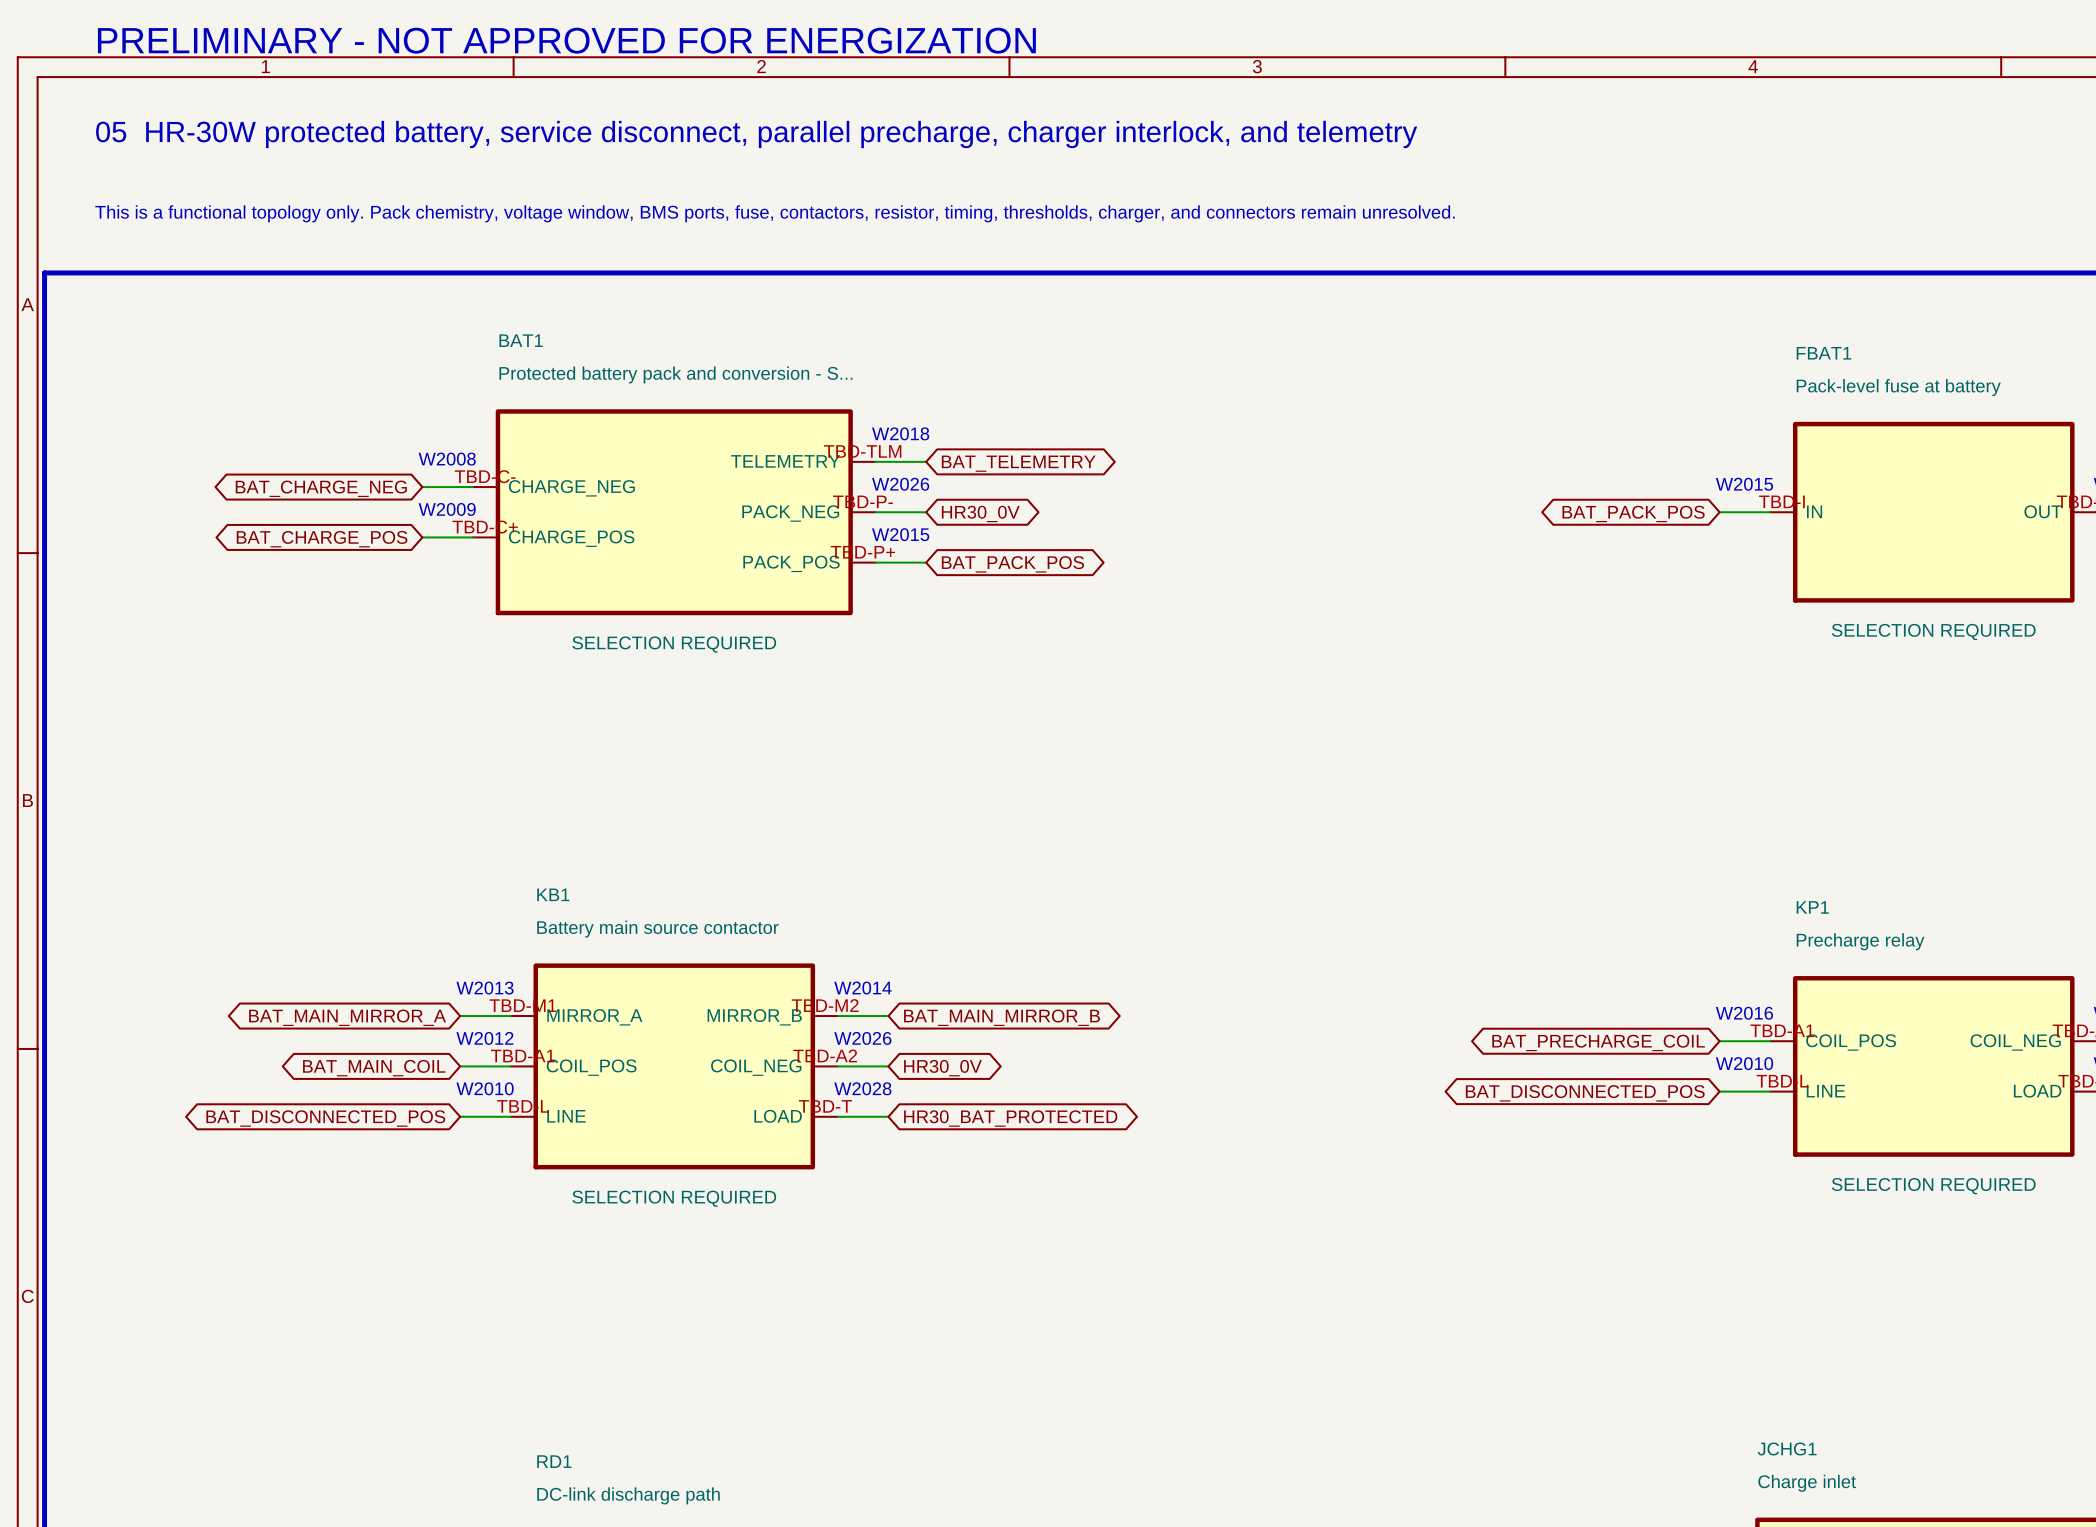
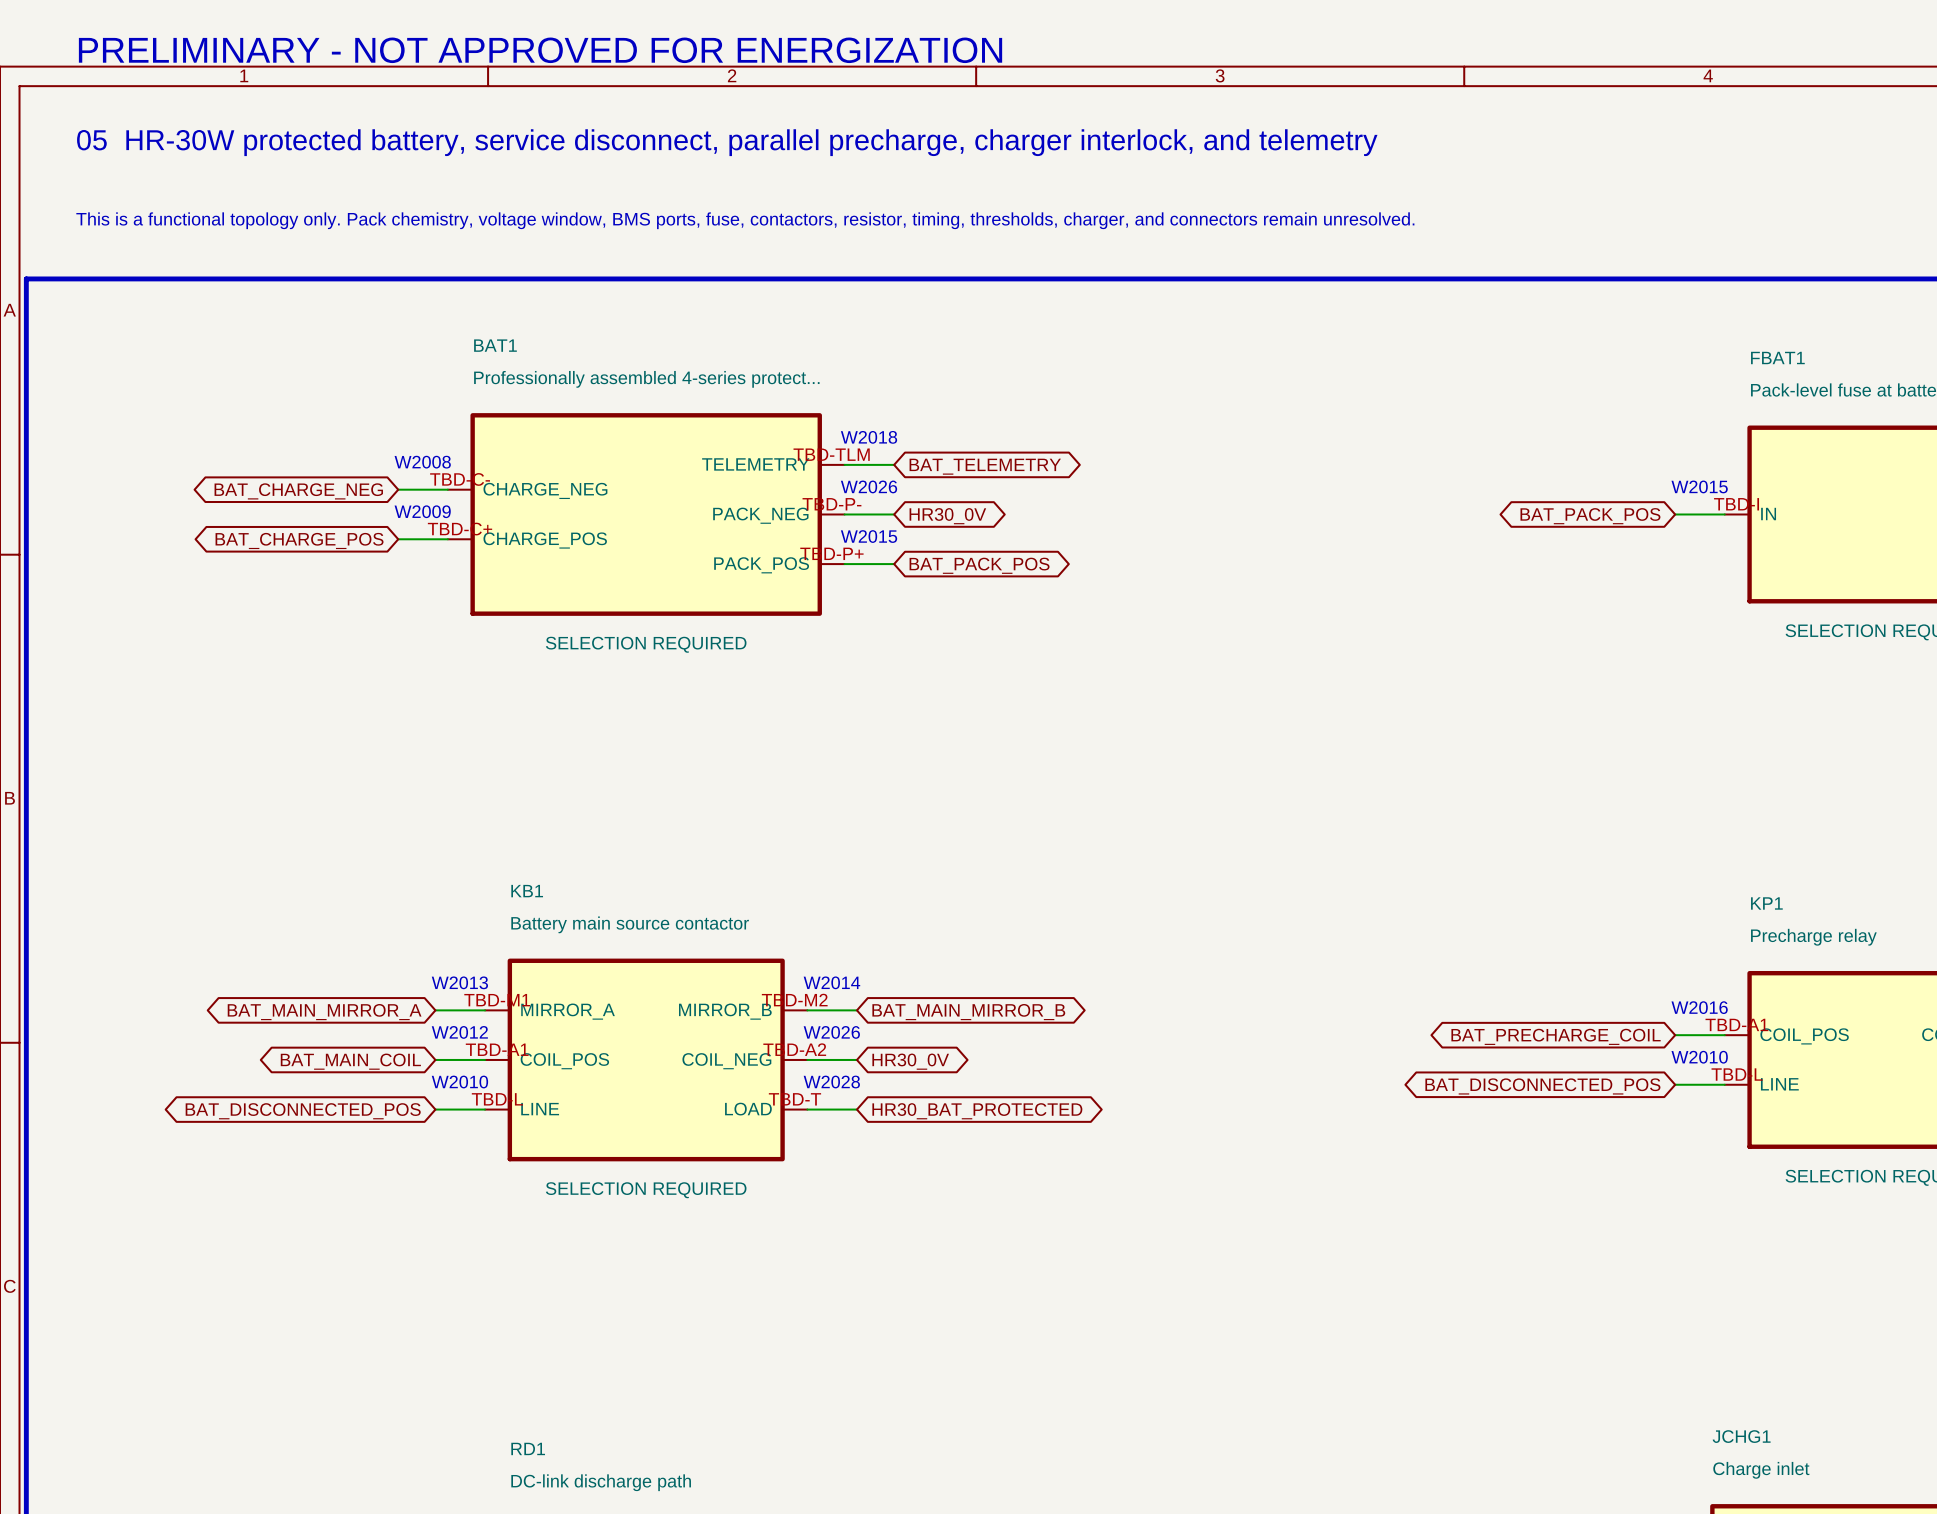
BAT1 text: Protected battery pack and conversion - S... (675, 374) -> Professionally assembled 4-series protect... (646, 379)

